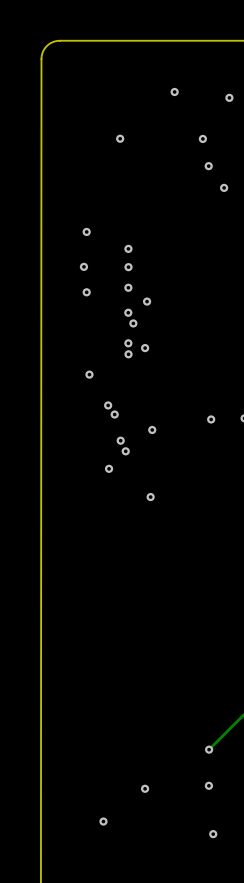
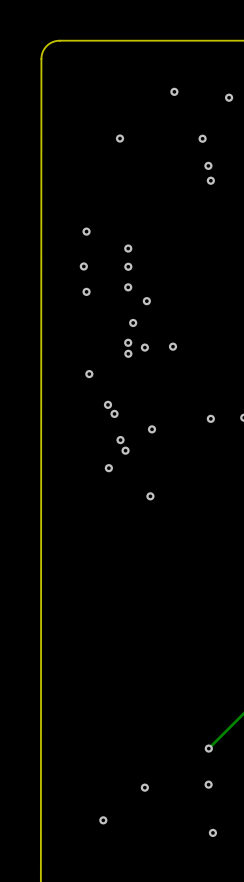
via position: (224, 187) -> (210, 180)
via position: (128, 312) -> (173, 346)

